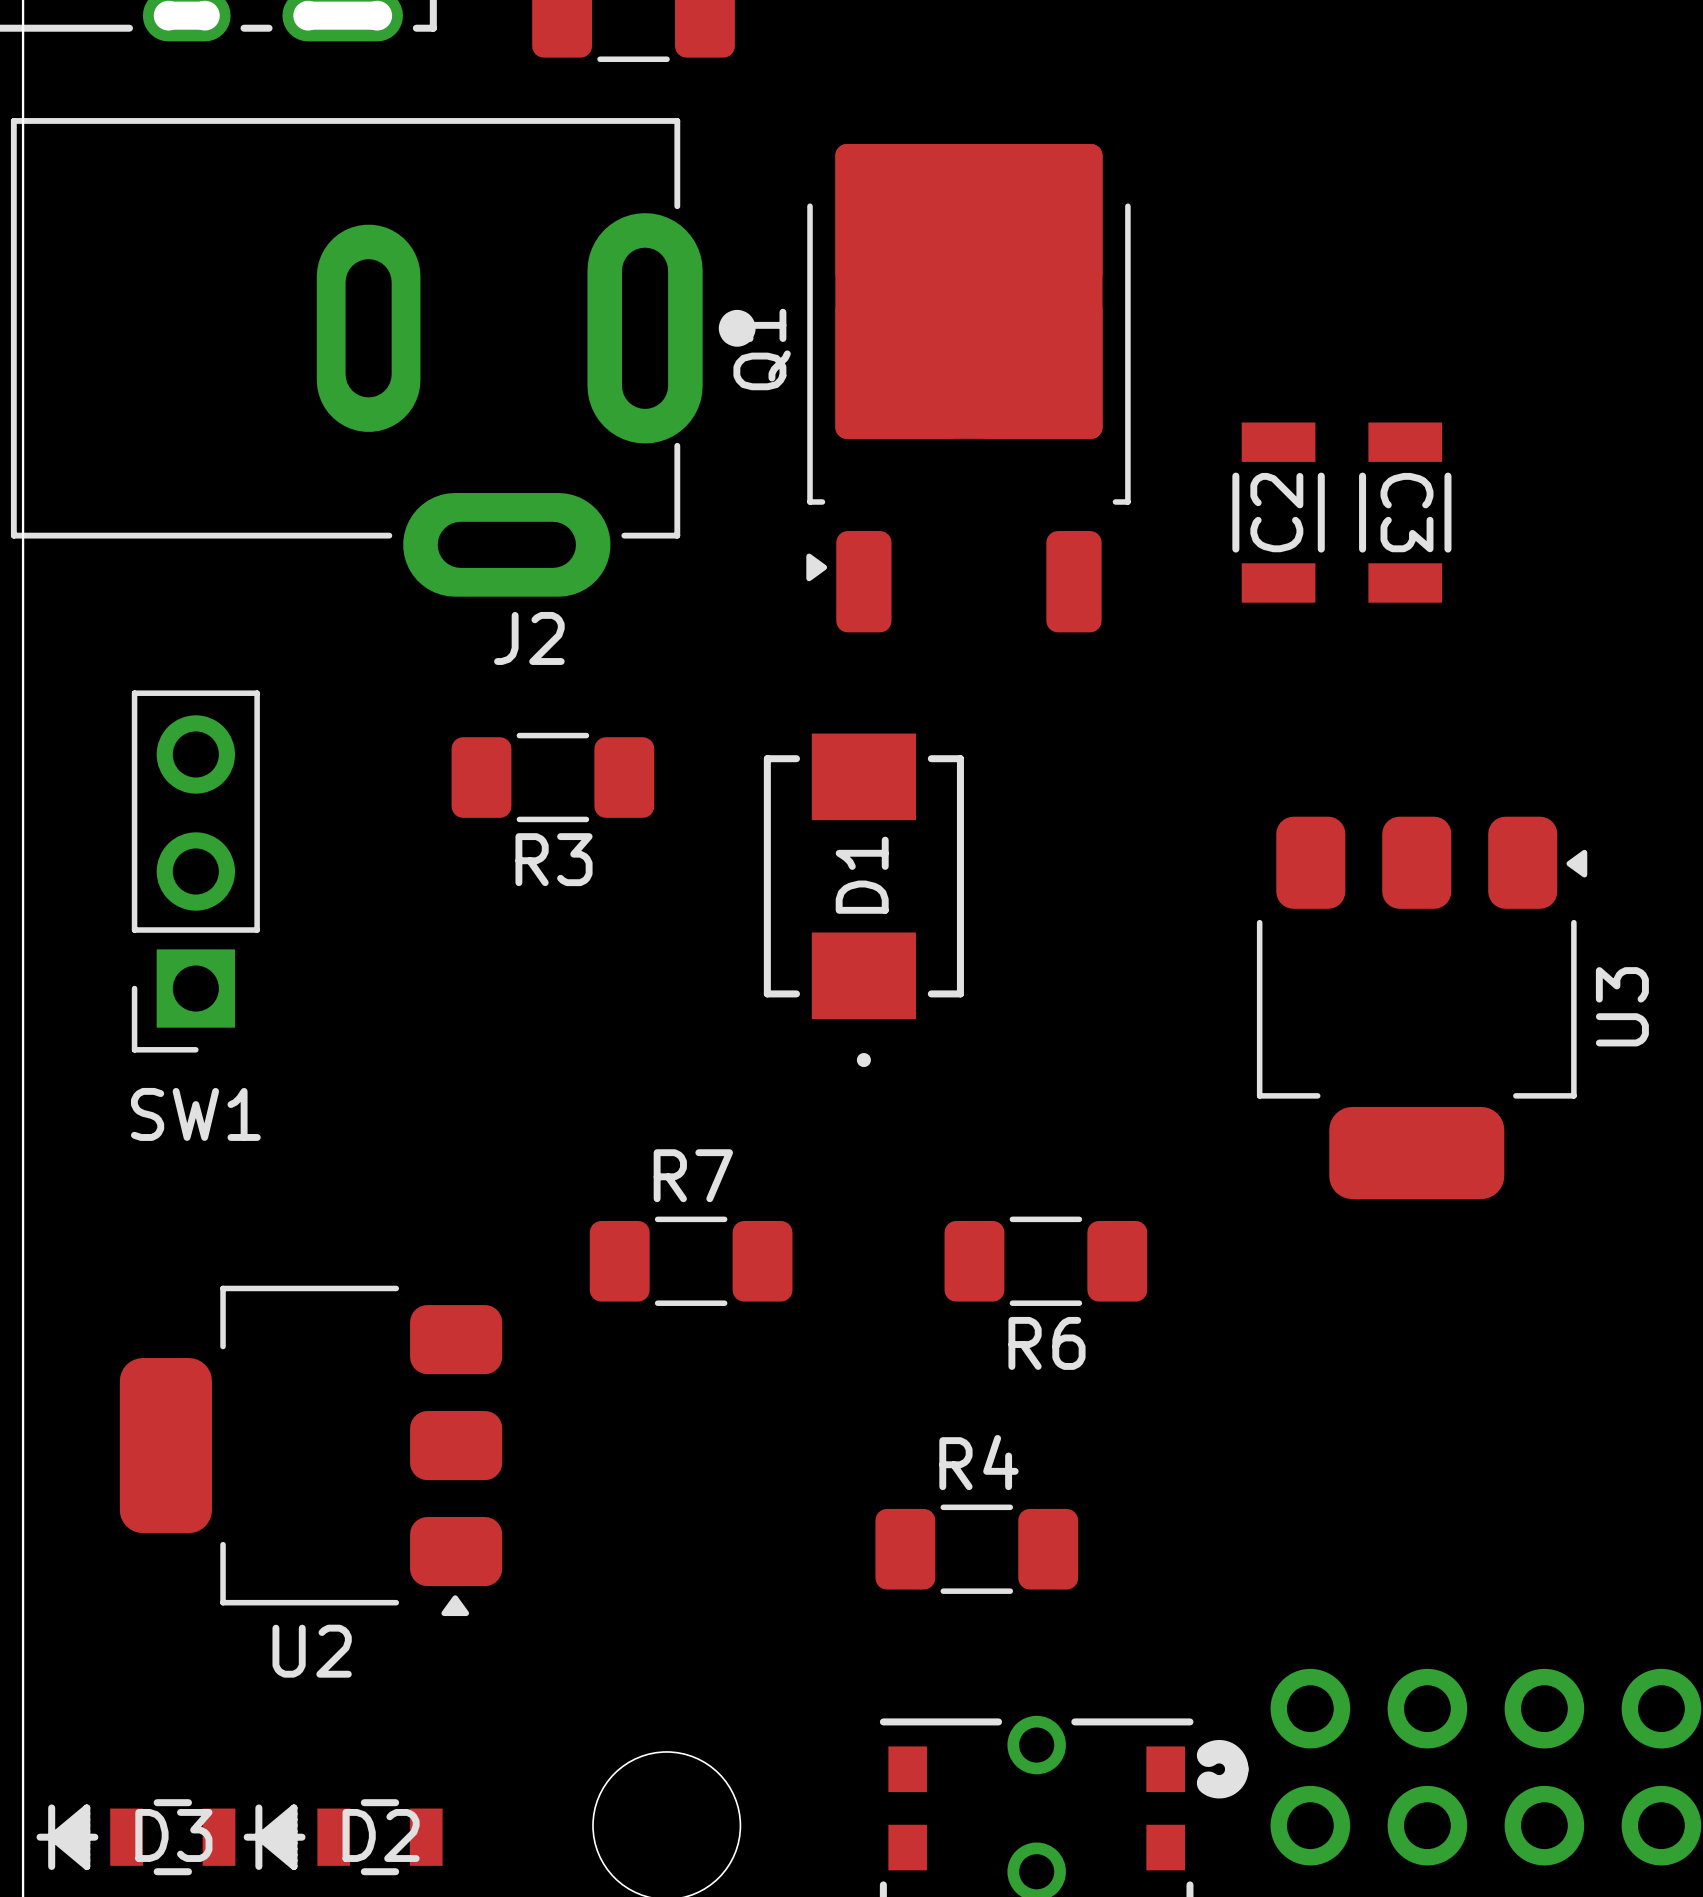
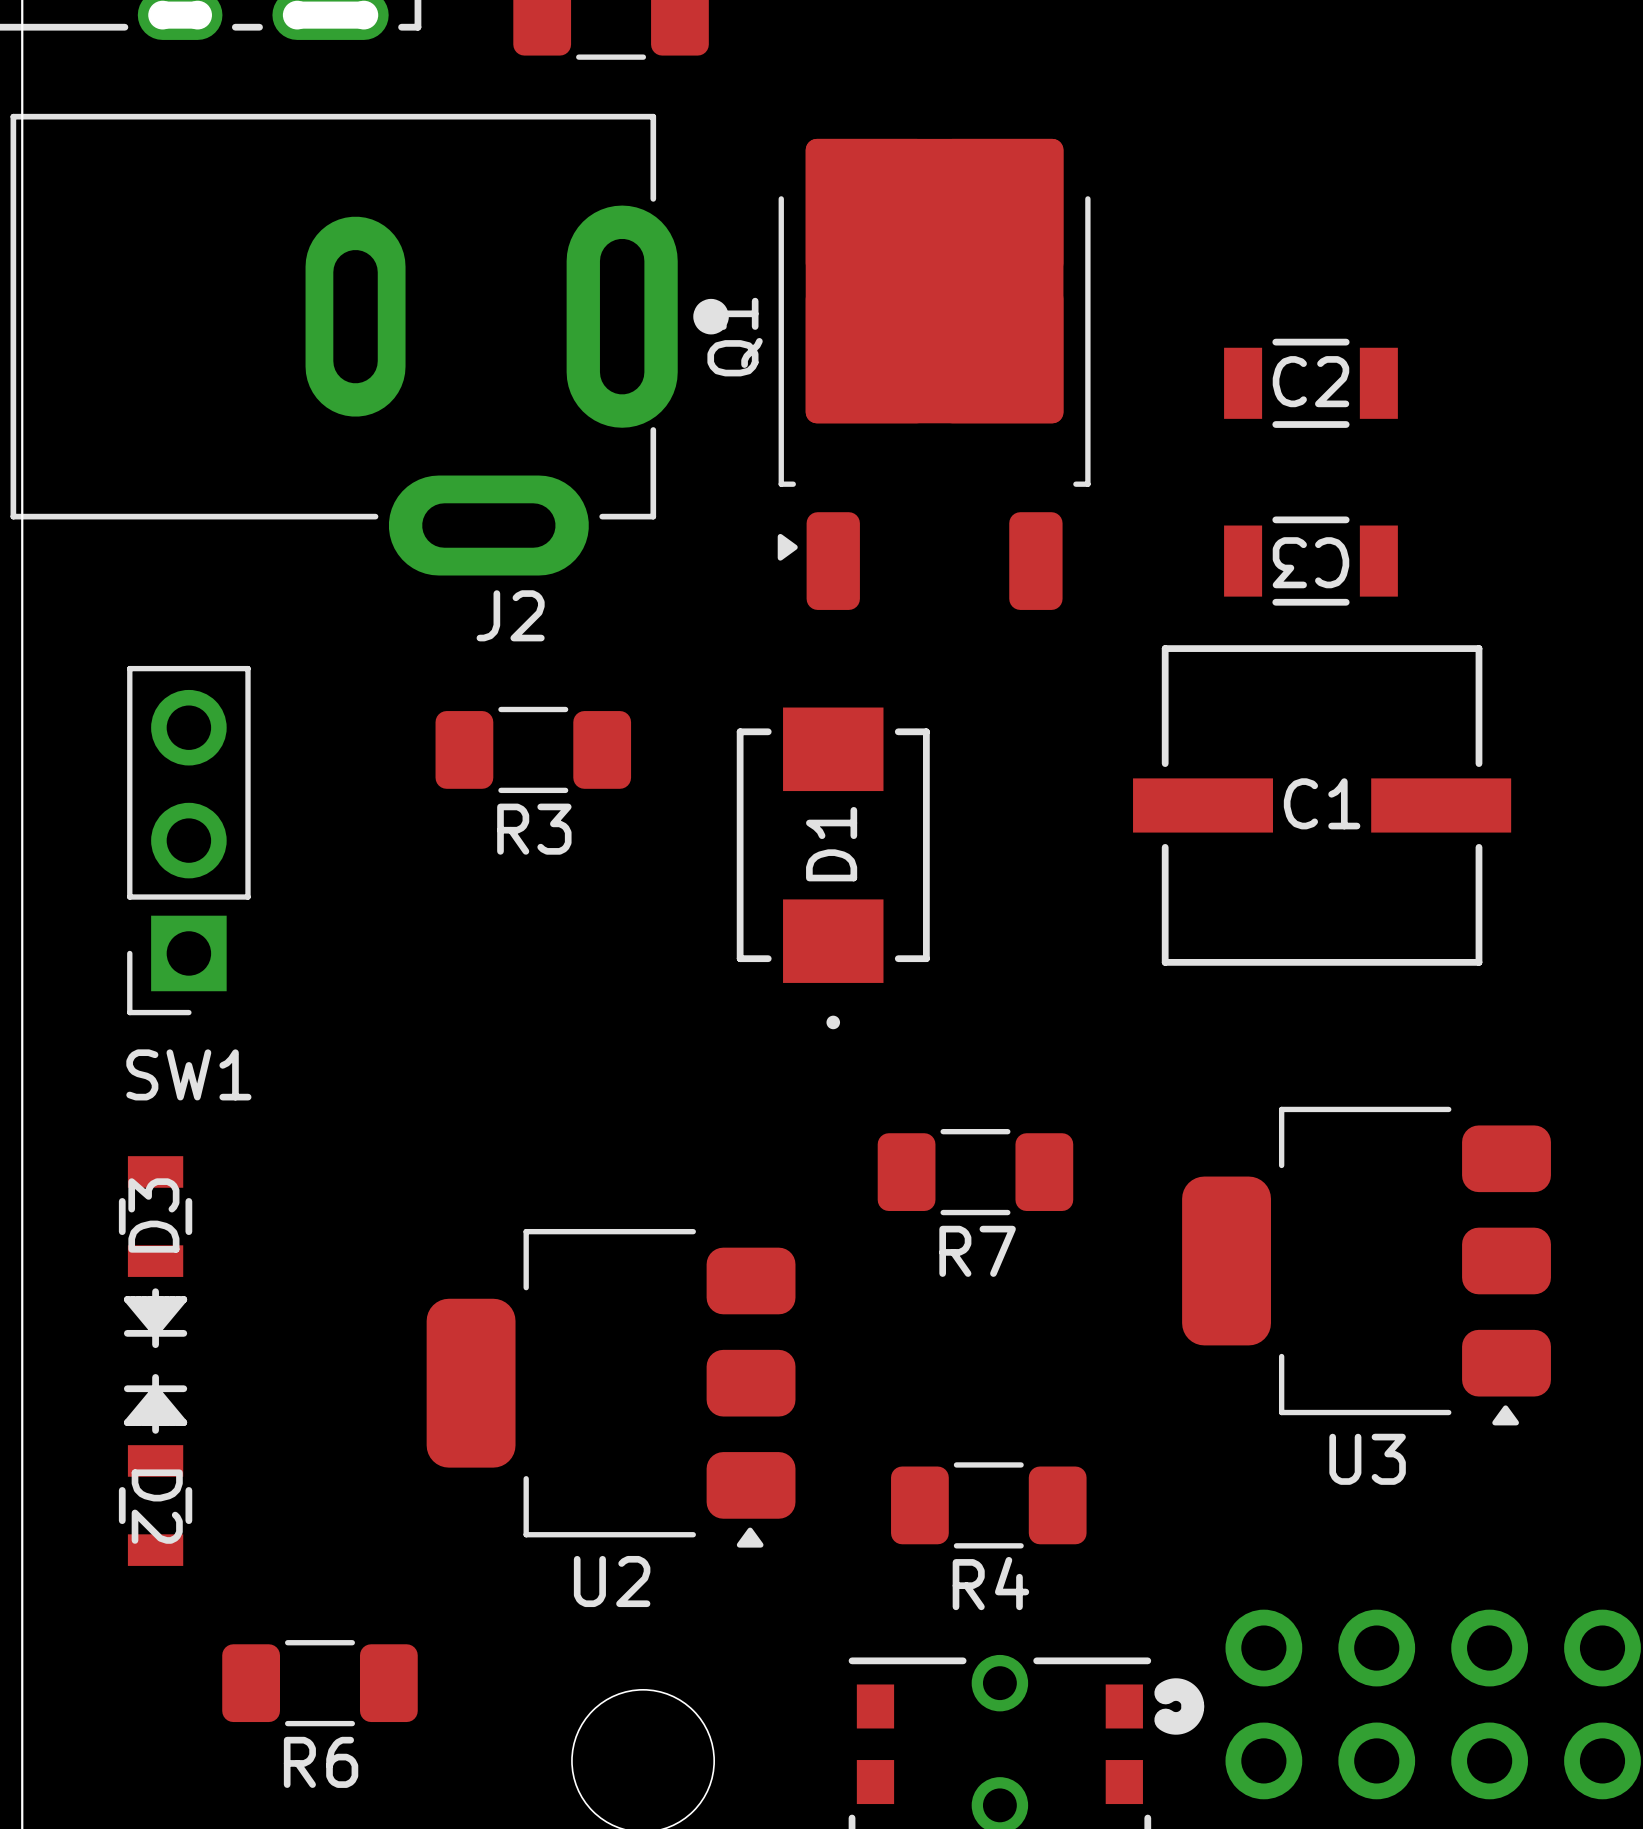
C2 rotation: 0° (1278, 512) -> 90° clockwise (1310, 383)
C2 position: (1278, 512) -> (1310, 383)
C3 rotation: 0° (1405, 512) -> 90° clockwise (1310, 561)
C1: none -> (1322, 805)
U3 rotation: 0° (1422, 1007) -> 90° clockwise (1366, 1266)
U3 position: (1422, 1007) -> (1366, 1266)
R7 name position: R7 (693, 1175) -> R7 (977, 1251)
R7 position: (691, 1261) -> (975, 1172)
R6 position: (1045, 1261) -> (319, 1683)
U2 position: (311, 1450) -> (611, 1388)
R4 name position: R4 (978, 1462) -> R4 (990, 1583)
R4 position: (976, 1549) -> (988, 1505)
D3 rotation: 0° (135, 1837) -> 90° counterclockwise (155, 1252)
D3 position: (135, 1837) -> (155, 1252)
D2 rotation: 0° (343, 1837) -> 90° clockwise (155, 1469)
D2 position: (343, 1837) -> (155, 1469)

